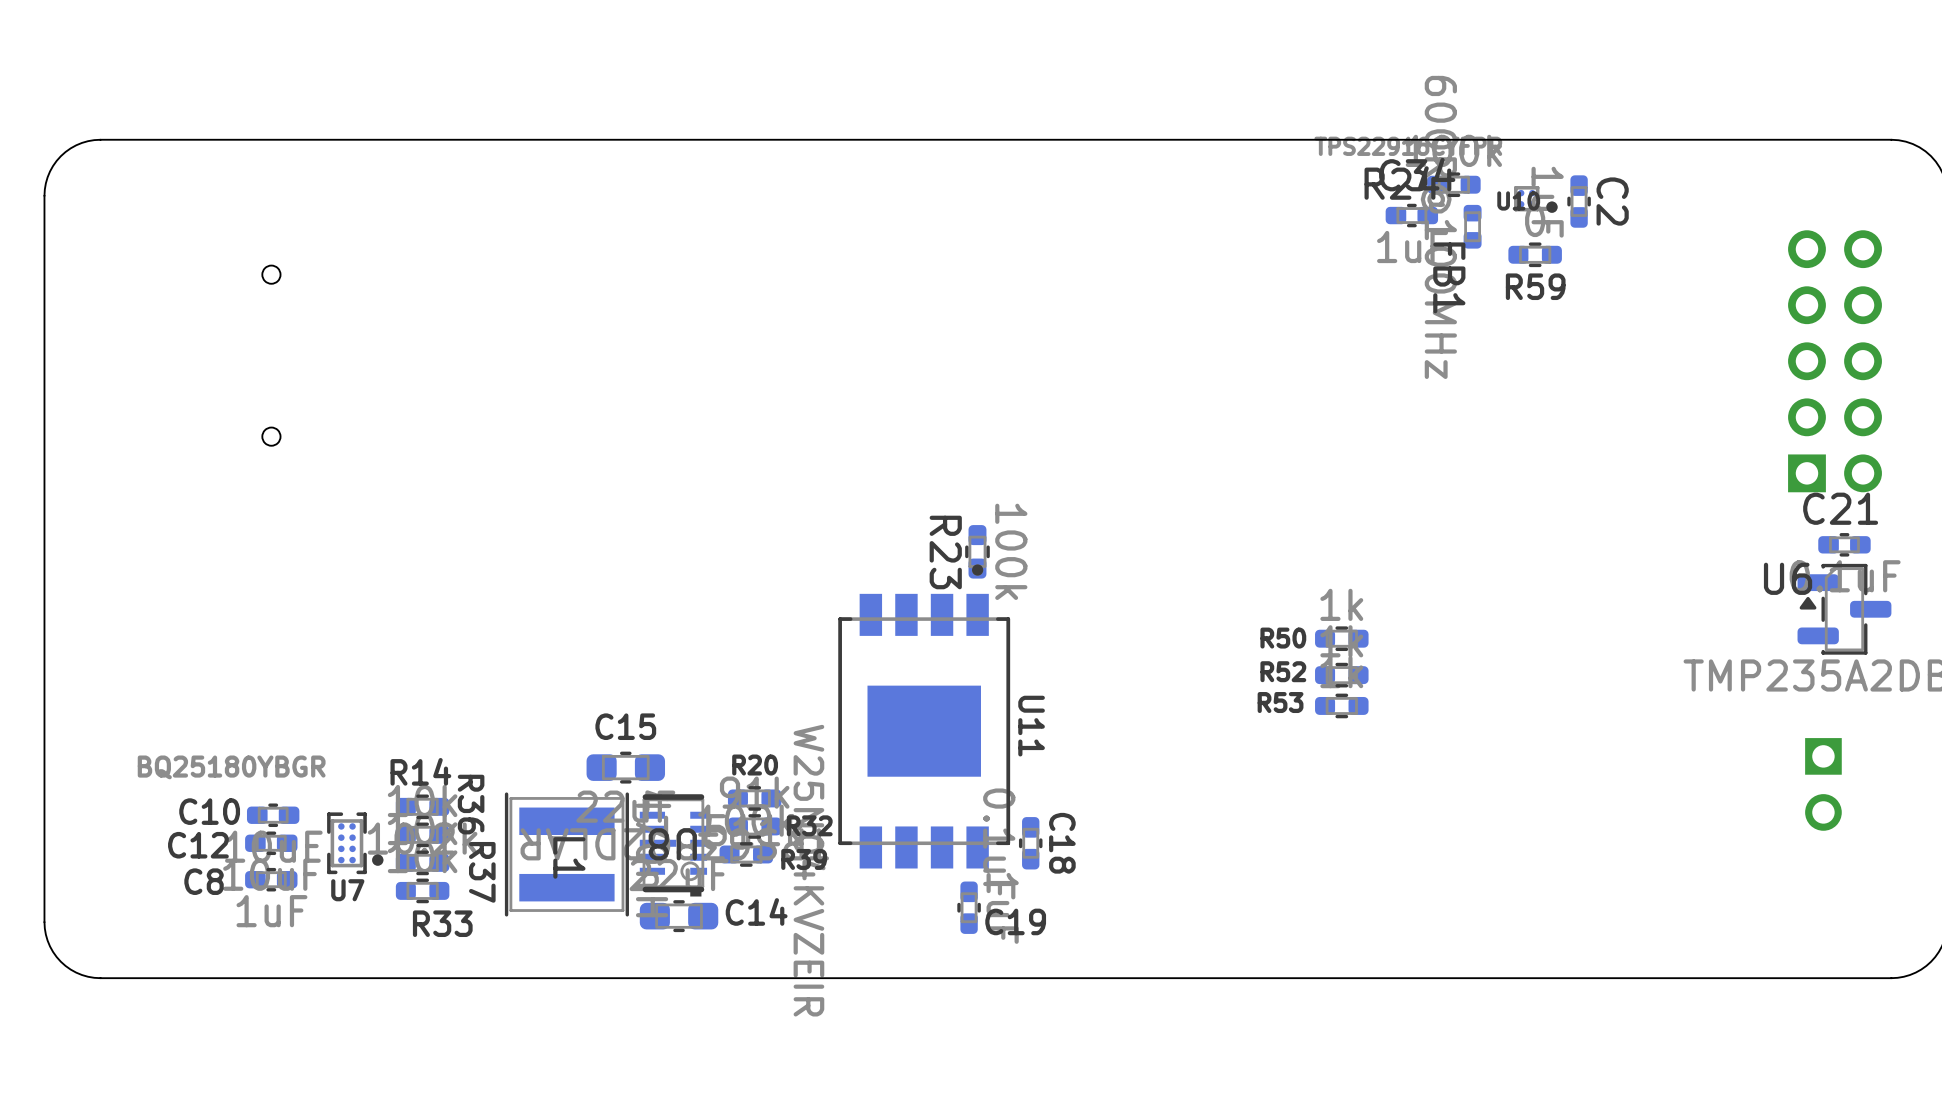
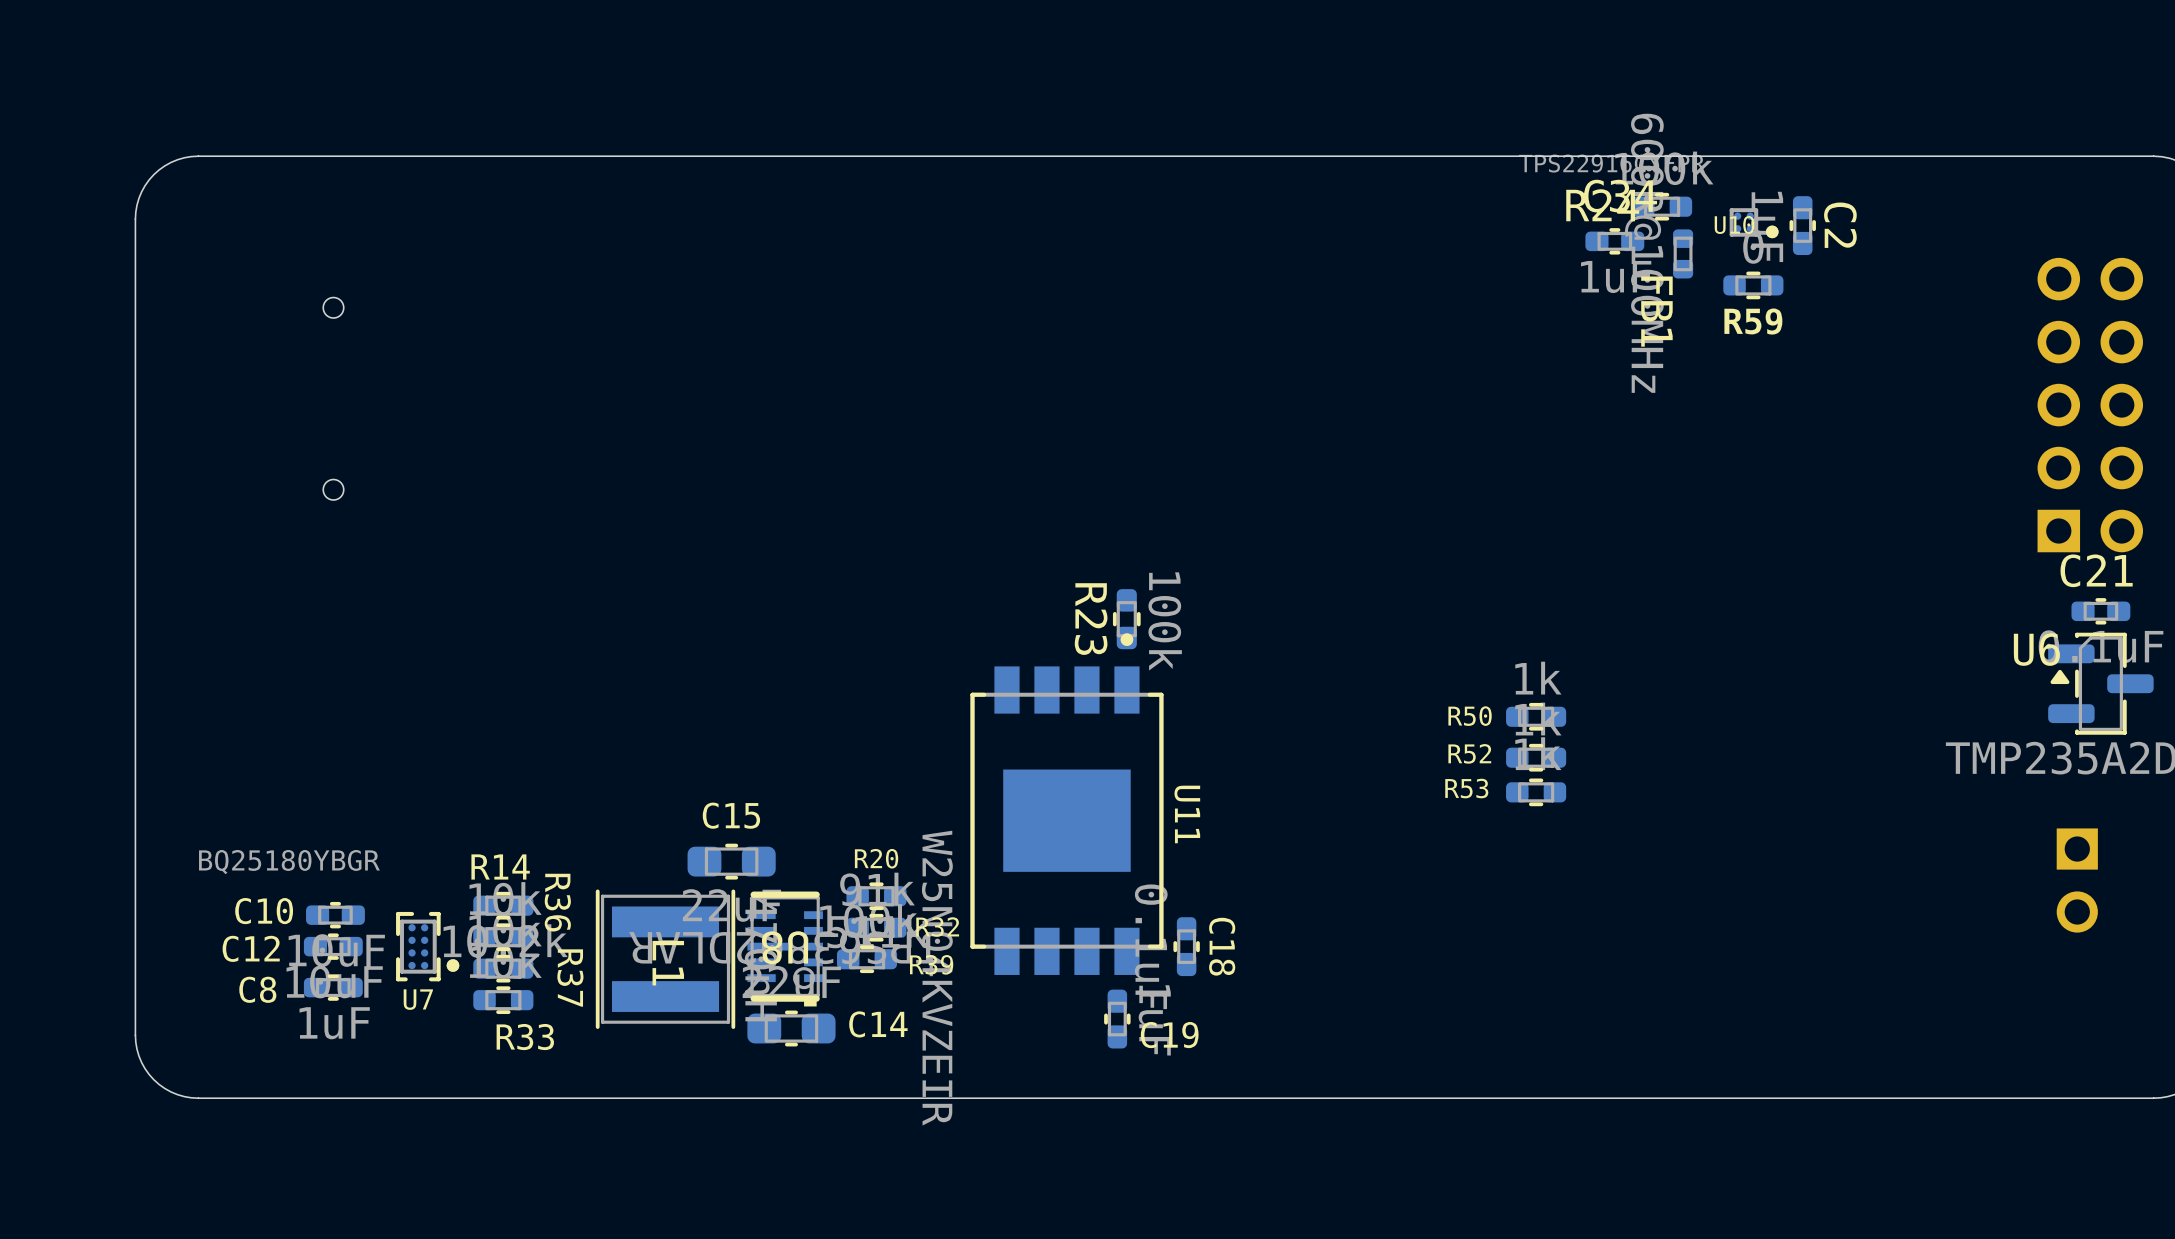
board edge: (151, 139) (94, 140) (76, 145) (56, 160) (50, 171) (44, 189) (44, 922) (45, 934) (53, 951) (60, 961) (76, 972) (94, 977) (151, 978) -> (198, 156) (184, 157) (171, 162) (153, 174) (145, 185) (138, 198) (135, 219) (135, 1042) (138, 1056) (145, 1068) (159, 1084) (177, 1094) (198, 1098)

